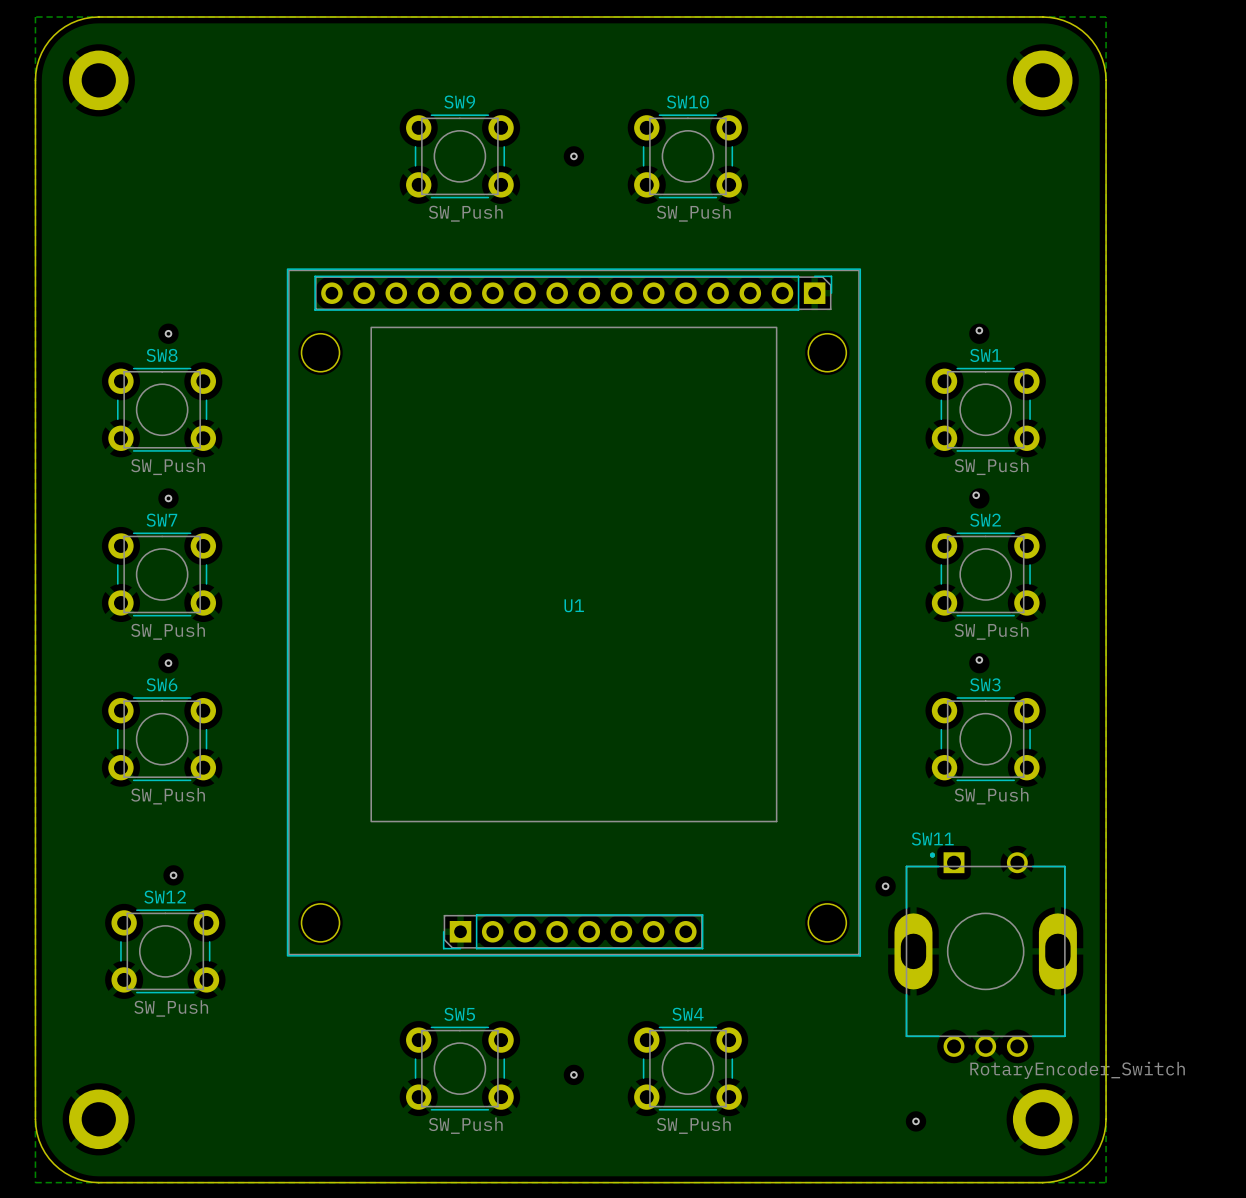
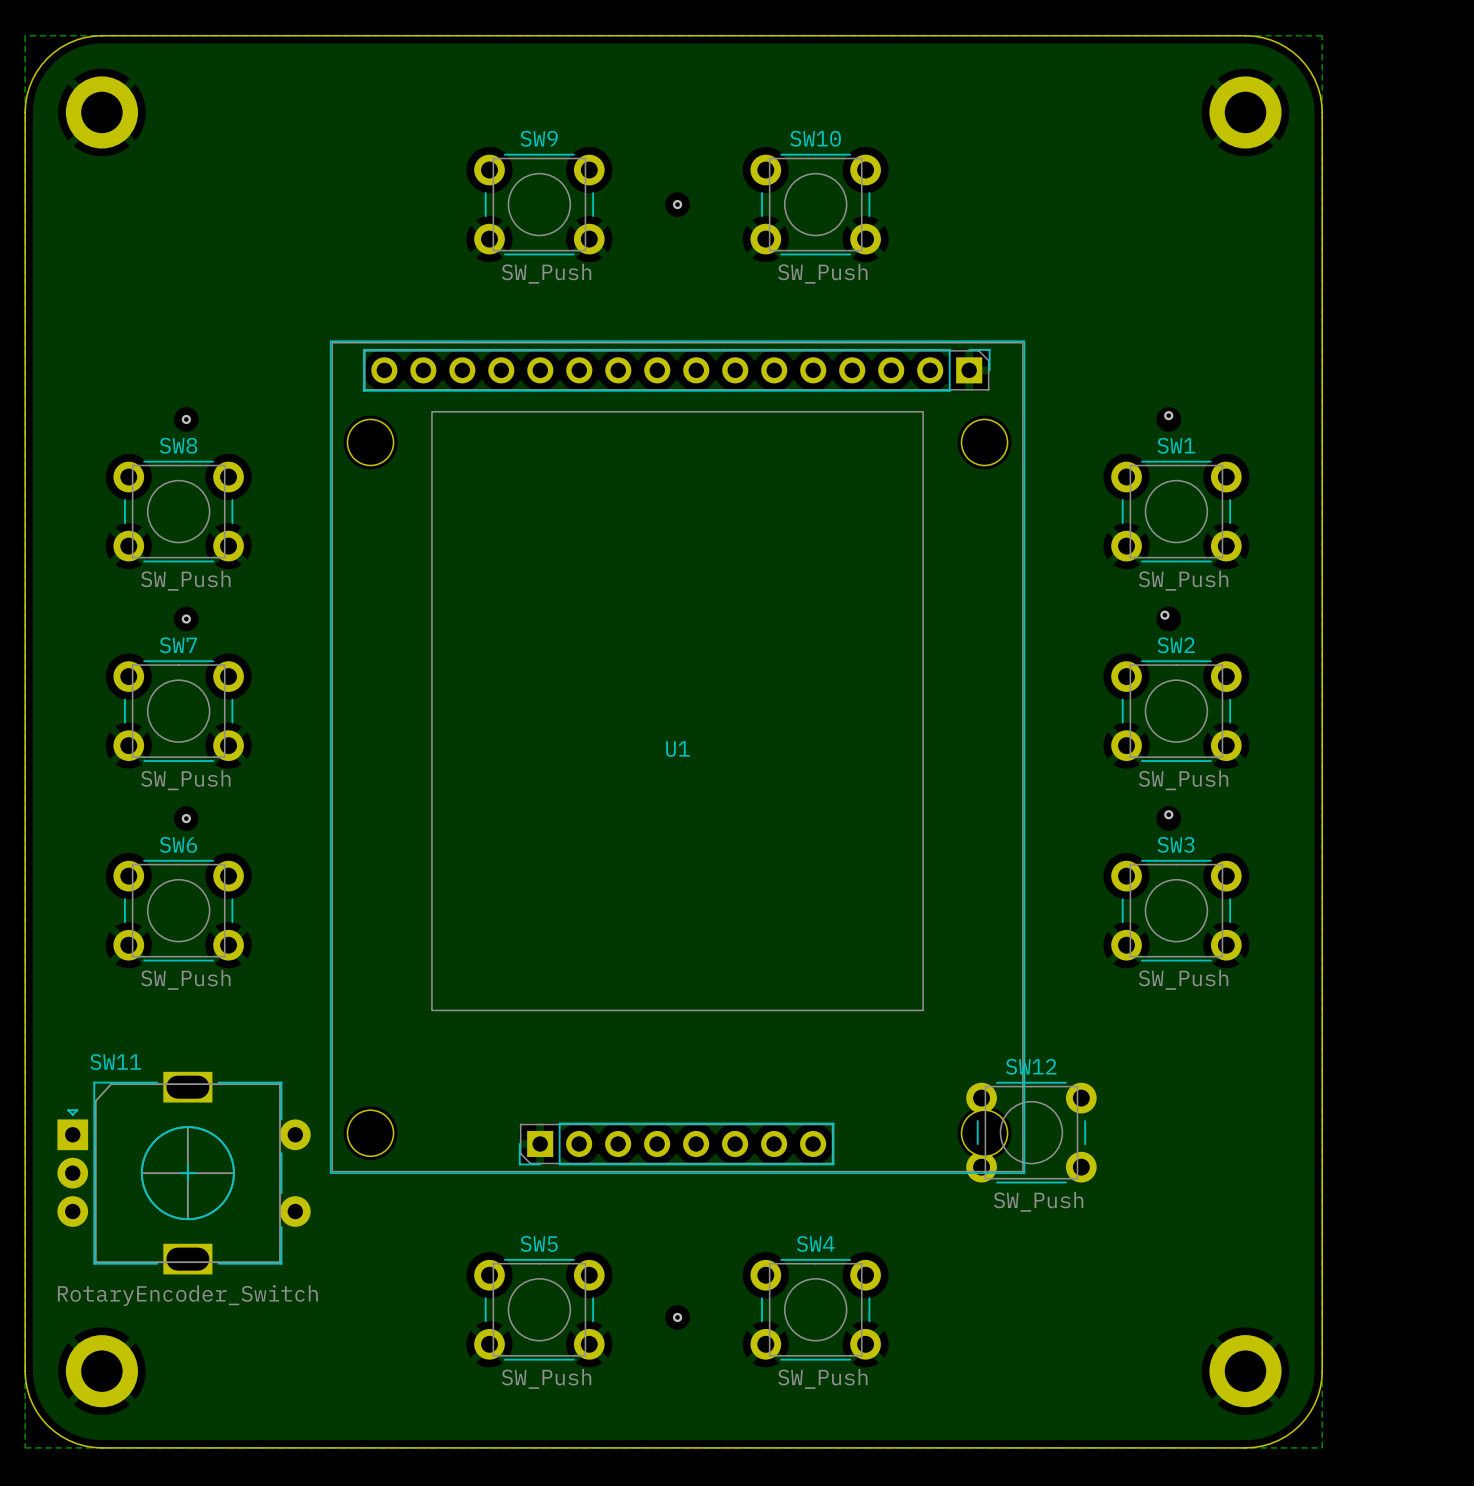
SW11 footprint: [894, 852, 1077, 1057] -> [57, 1071, 311, 1275]
via: (173, 875) -> none
via: (885, 886) -> none
SW12 position: (165, 951) -> (1031, 1132)
SW11 value position: RotaryEncoder_Switch (1077, 1070) -> RotaryEncoder_Switch (187, 1295)
via: (916, 1121) -> none

